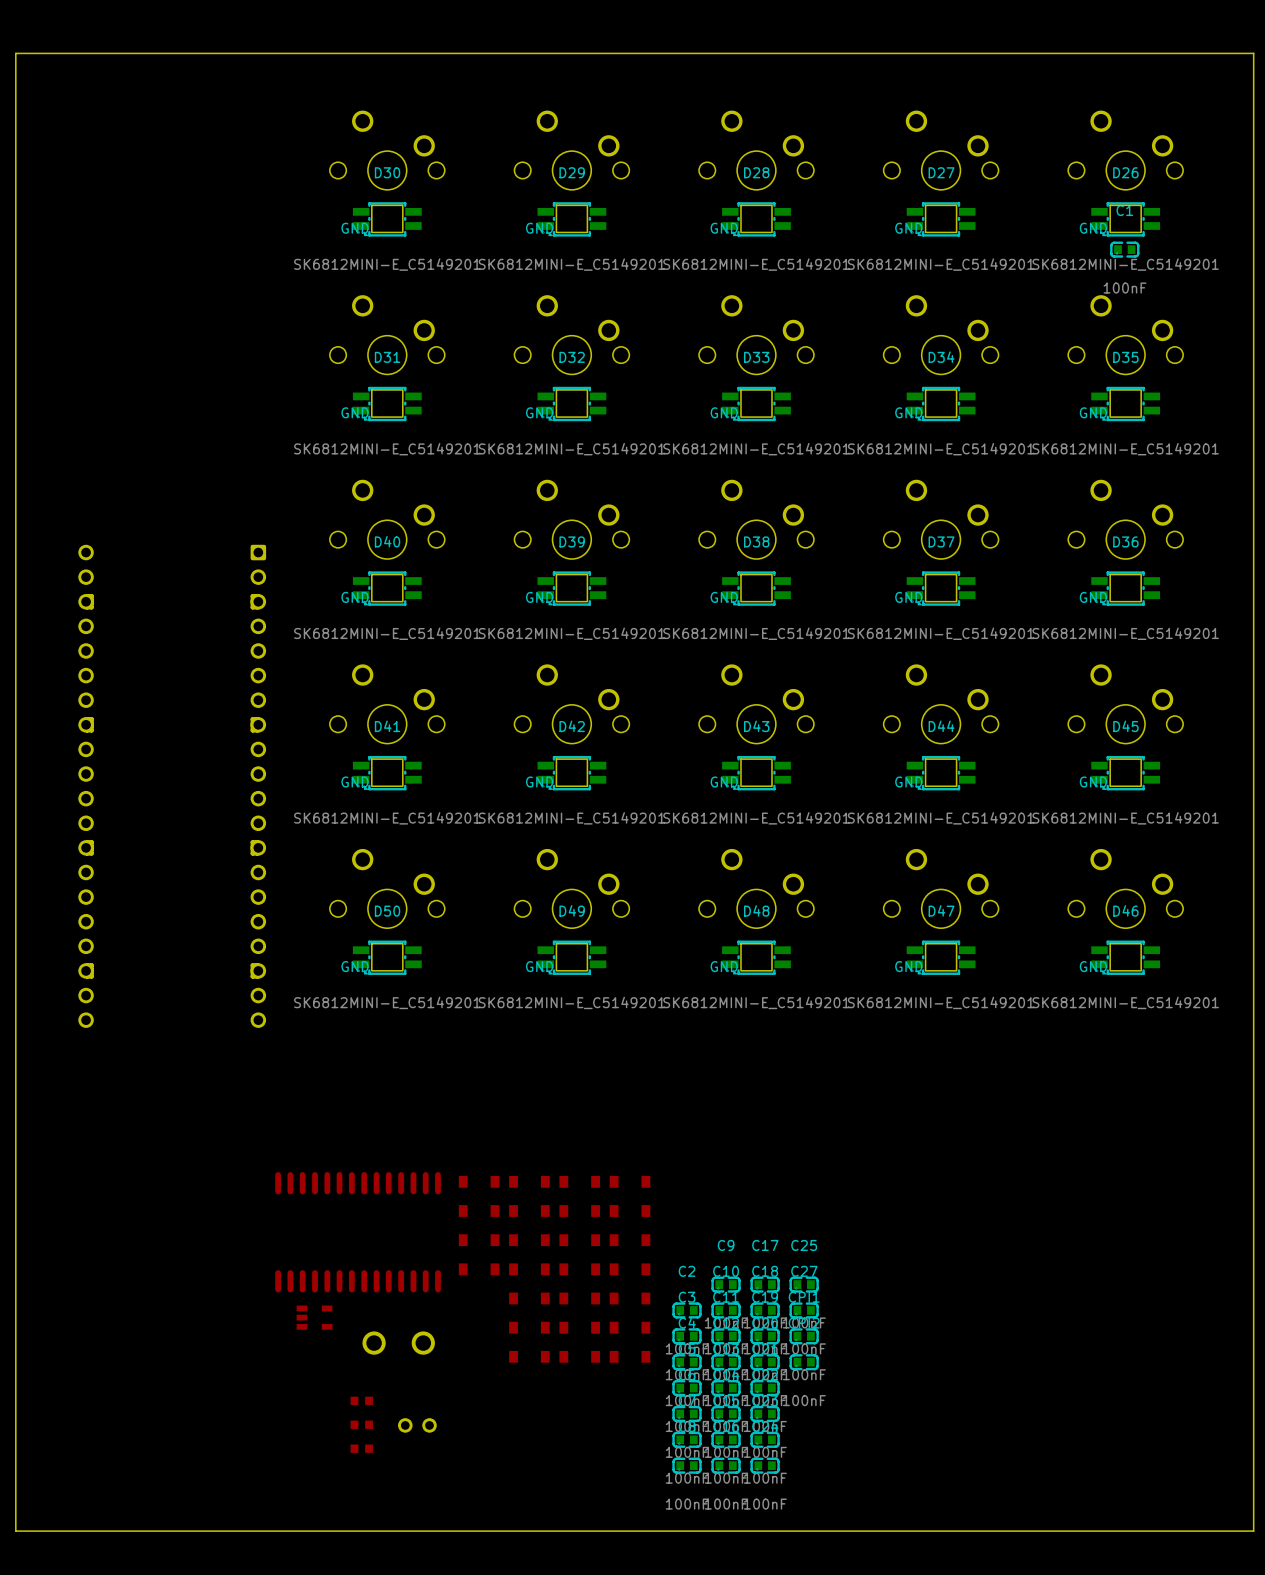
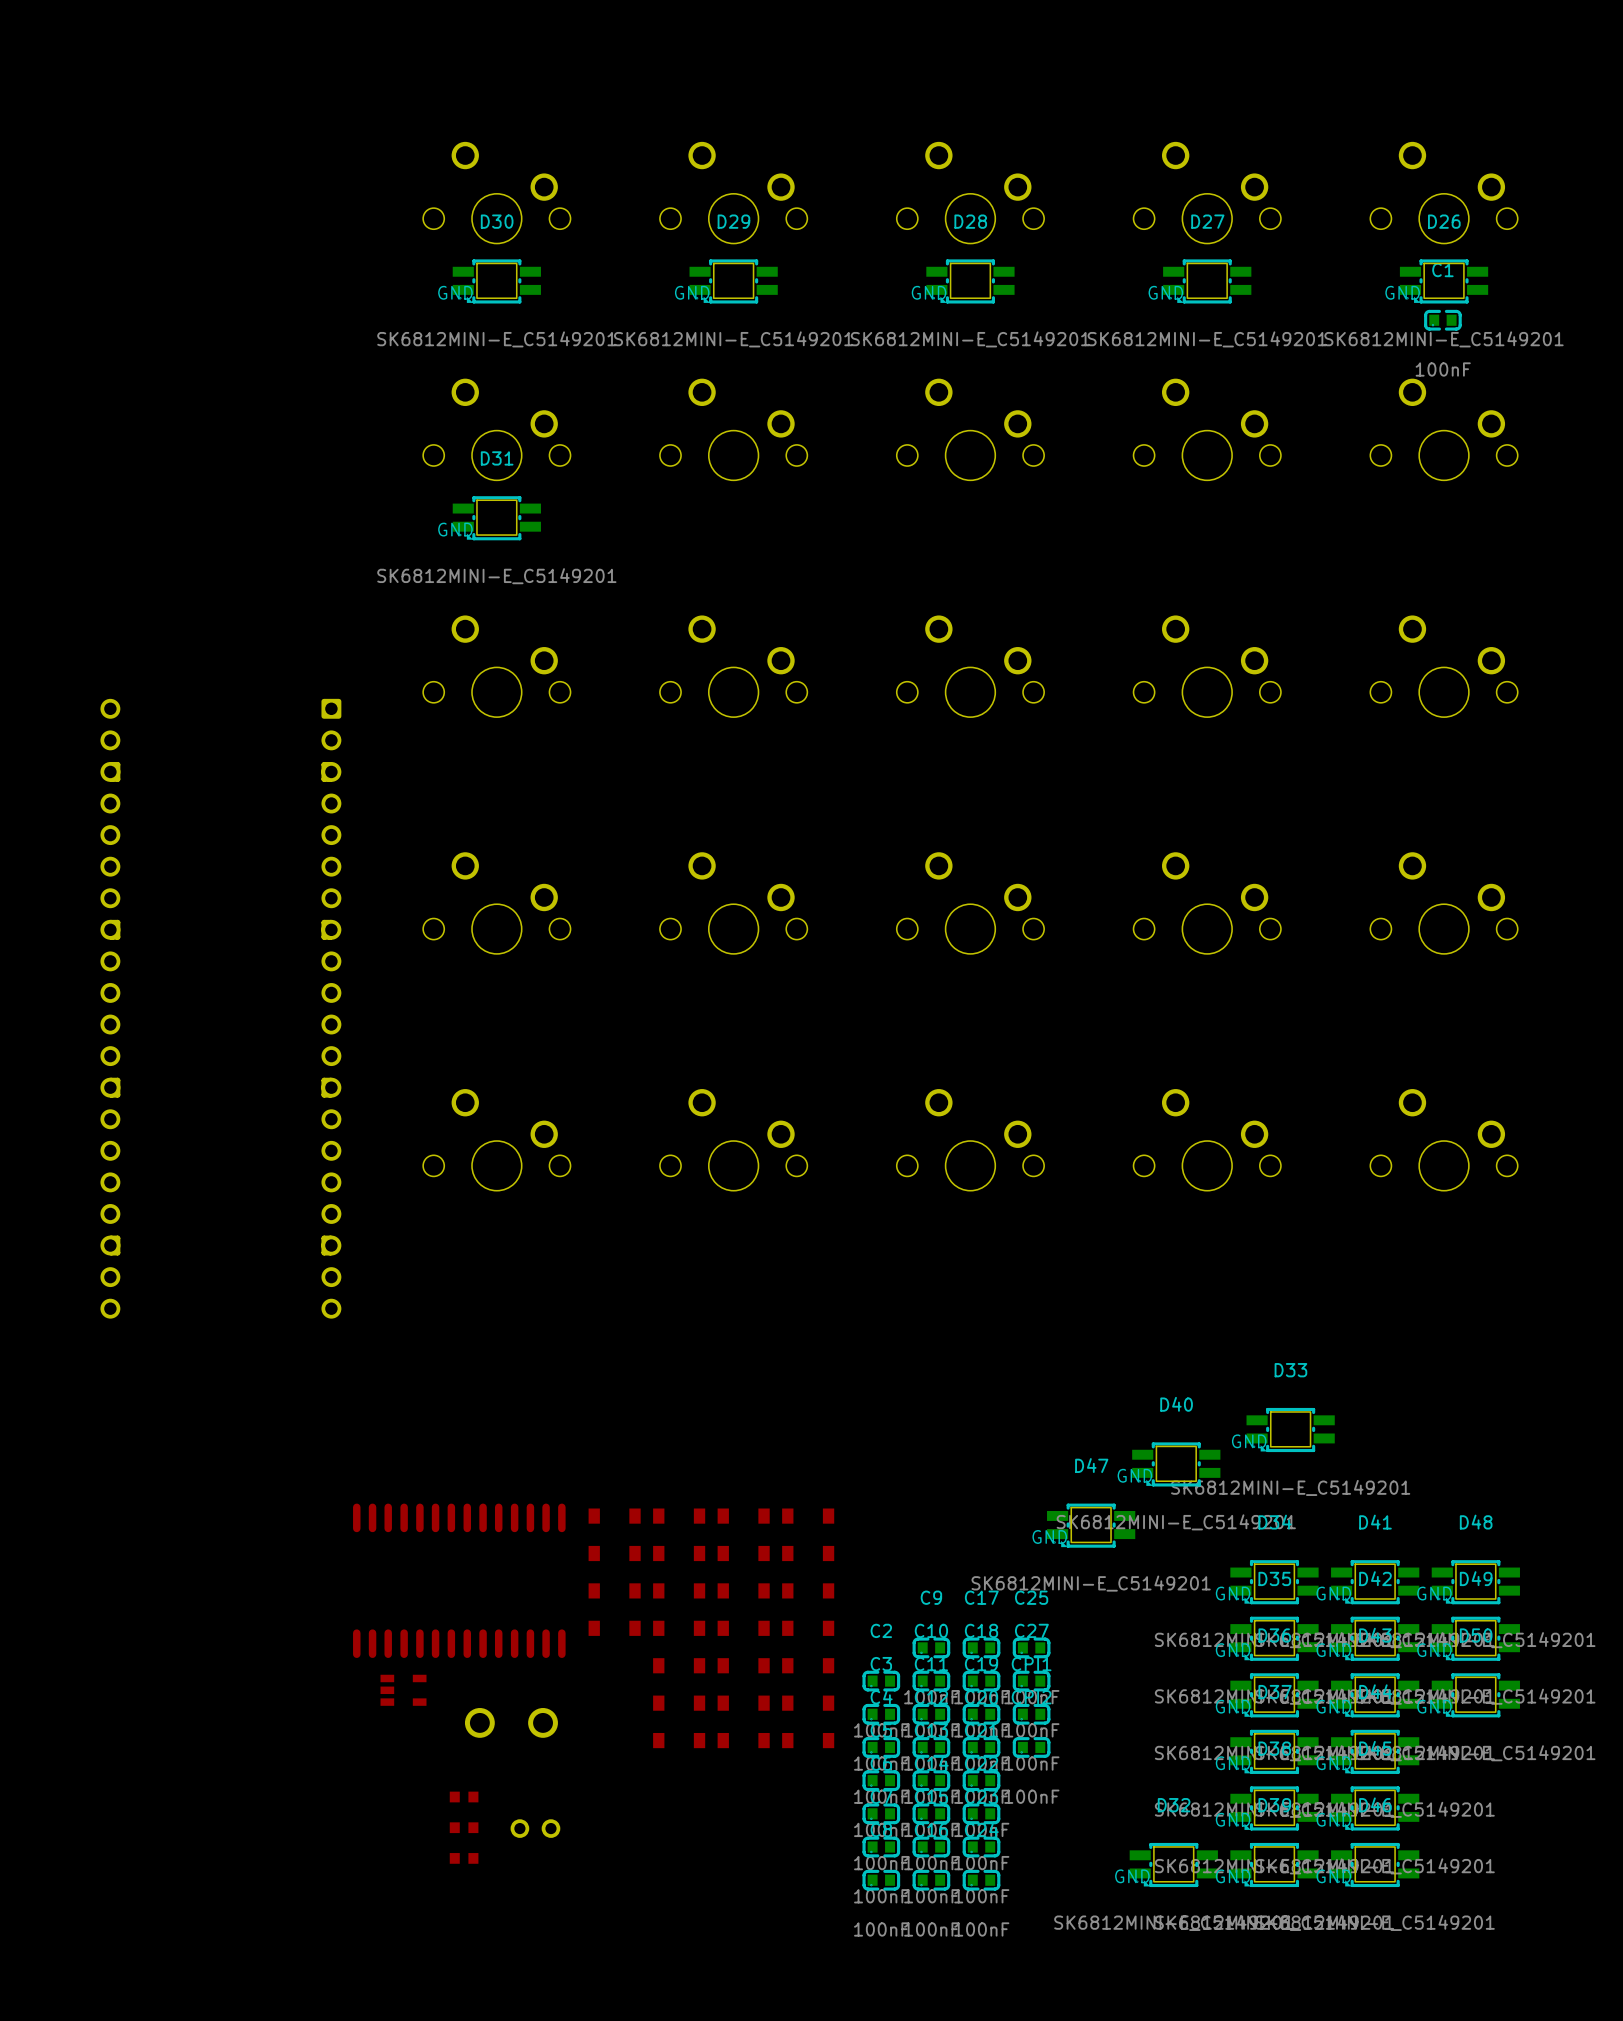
board edge: (1253, 53) (15, 53) (15, 1531) (1253, 1531) (1253, 53) -> none
D32 position: (571, 403) -> (1173, 1865)
D33 position: (756, 403) -> (1290, 1430)
D34 position: (941, 403) -> (1274, 1582)
D35 position: (1125, 403) -> (1274, 1638)
D40 position: (387, 588) -> (1176, 1464)
D39 position: (571, 588) -> (1274, 1865)
D38 position: (756, 588) -> (1274, 1808)
D37 position: (941, 588) -> (1274, 1751)
D36 position: (1125, 588) -> (1274, 1695)
D41 position: (387, 773) -> (1375, 1582)
D42 position: (571, 773) -> (1375, 1638)
D43 position: (756, 773) -> (1375, 1695)
D44 position: (941, 773) -> (1375, 1751)
D45 position: (1125, 773) -> (1375, 1808)
D50 position: (387, 957) -> (1475, 1695)
D49 position: (571, 957) -> (1475, 1638)
D48 position: (756, 957) -> (1475, 1582)
D47 position: (941, 957) -> (1091, 1525)
D46 position: (1125, 957) -> (1375, 1865)

